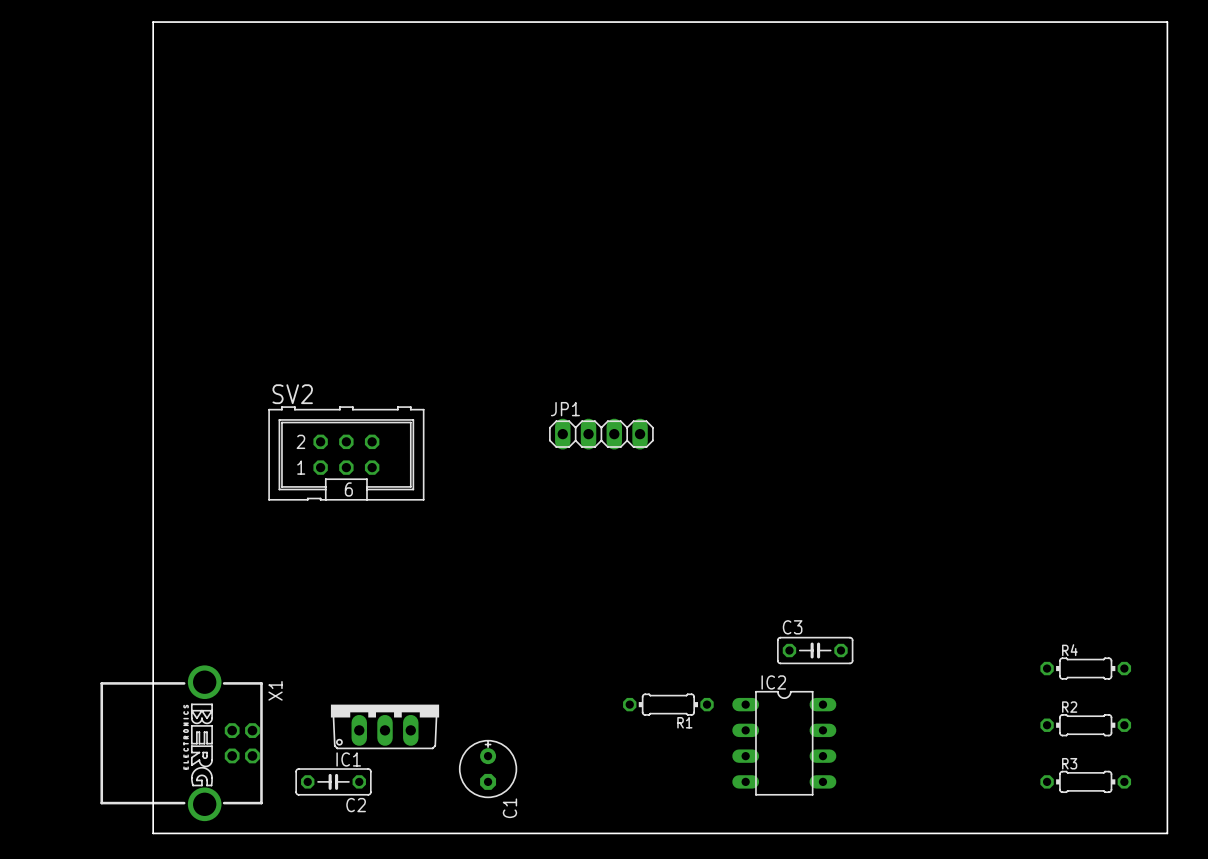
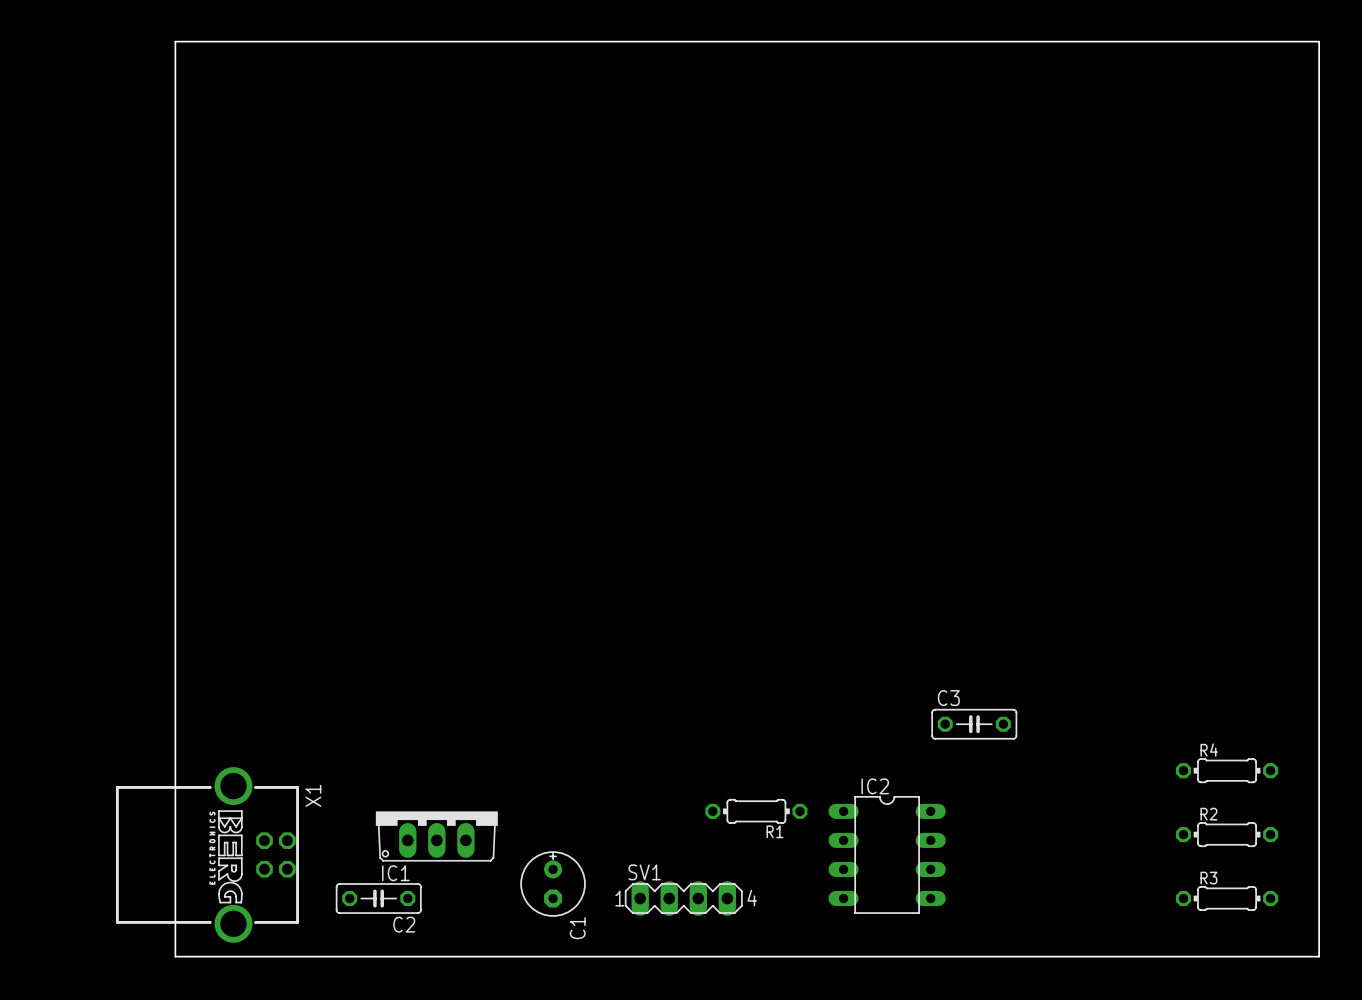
JP1: (601, 434) -> none
SV2: (346, 453) -> none
C3 position: (815, 650) -> (974, 724)
SV1: none -> (683, 898)

